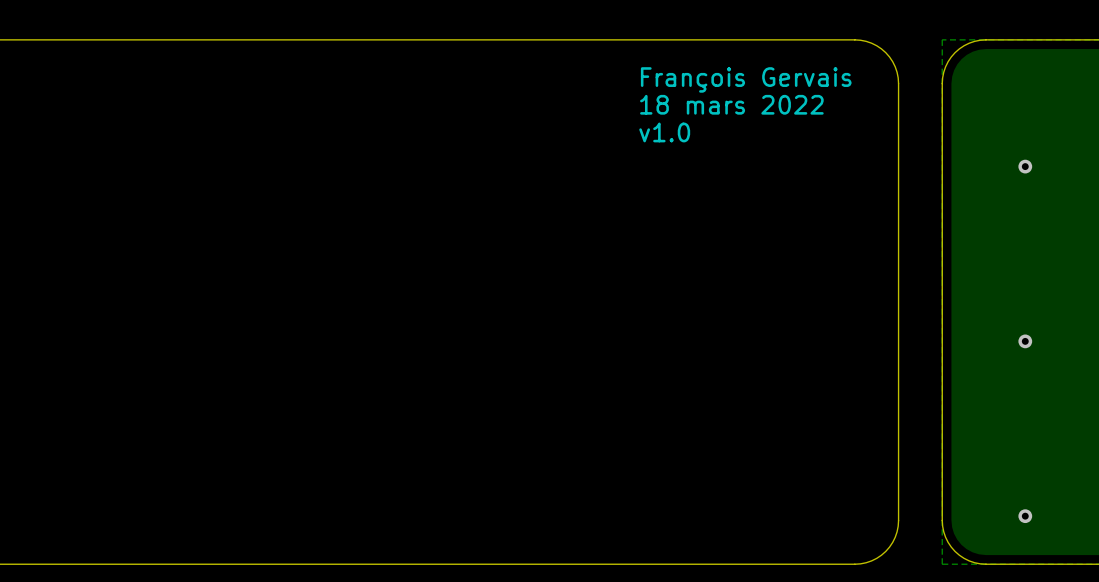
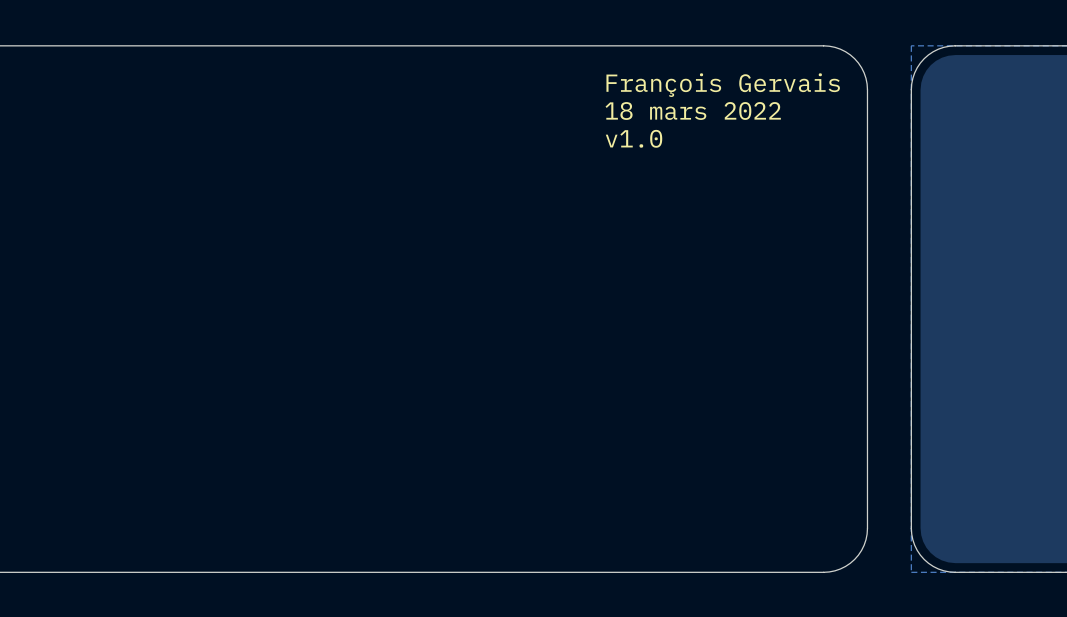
via: (1025, 166) -> none
via: (1025, 341) -> none
via: (1025, 516) -> none

